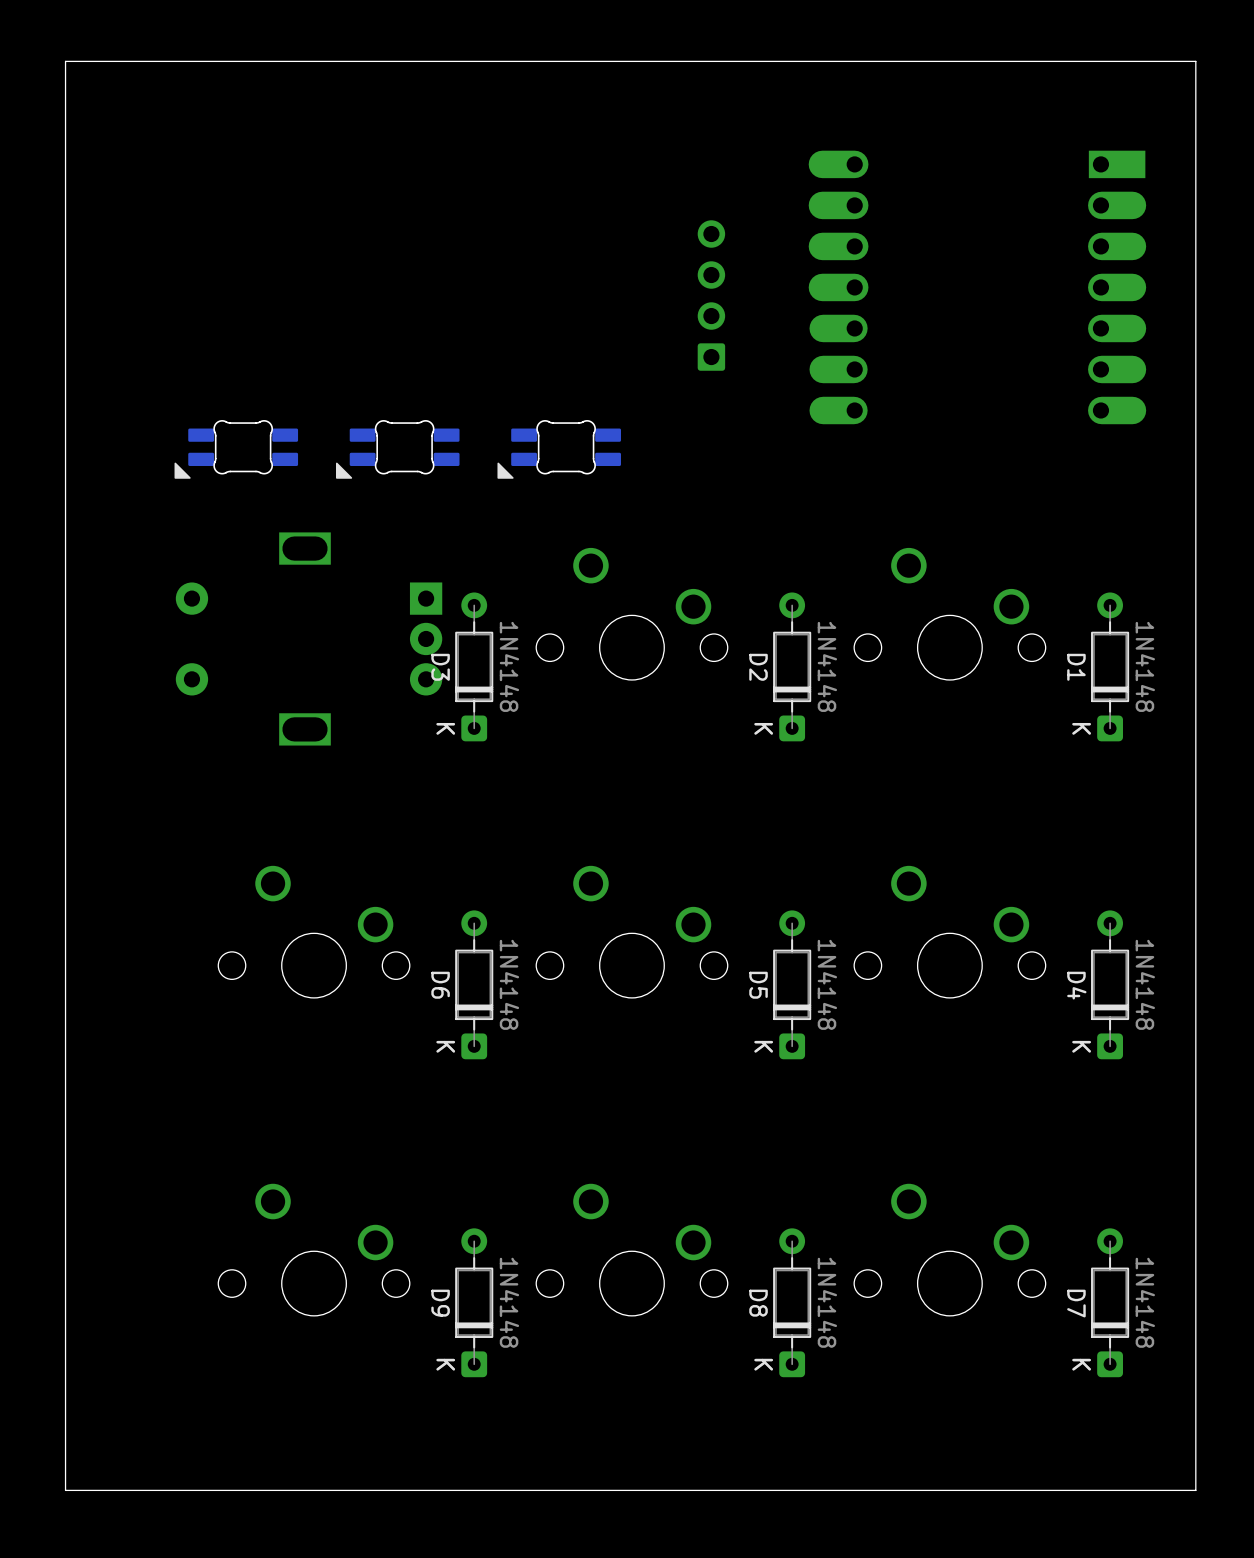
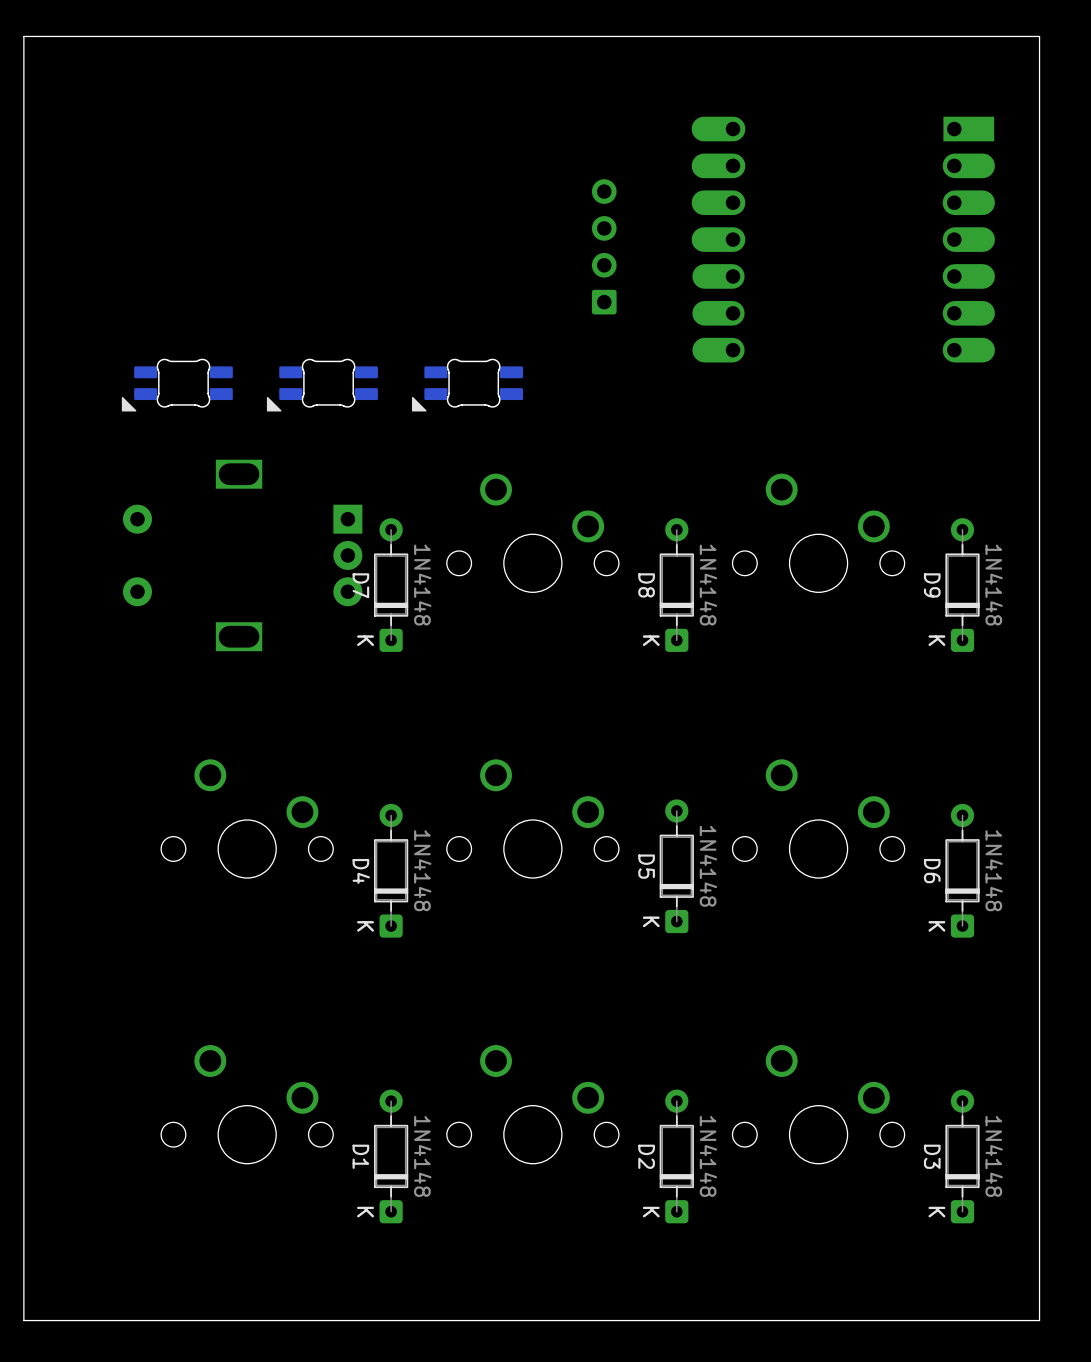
D3 position: (474, 666) -> (962, 1156)
D2 position: (792, 666) -> (676, 1156)
D1 position: (1110, 666) -> (391, 1156)
D6 position: (474, 984) -> (962, 870)
D4 position: (1110, 984) -> (391, 870)
D9 position: (474, 1302) -> (962, 585)
D8 position: (792, 1302) -> (676, 585)
D7 position: (1110, 1302) -> (391, 585)

